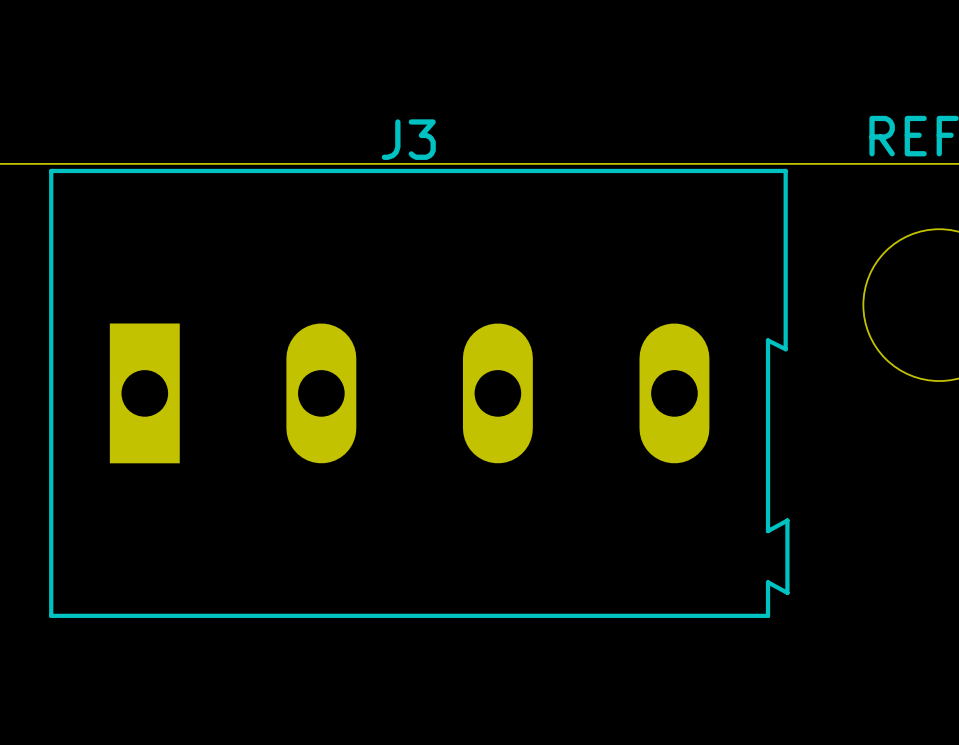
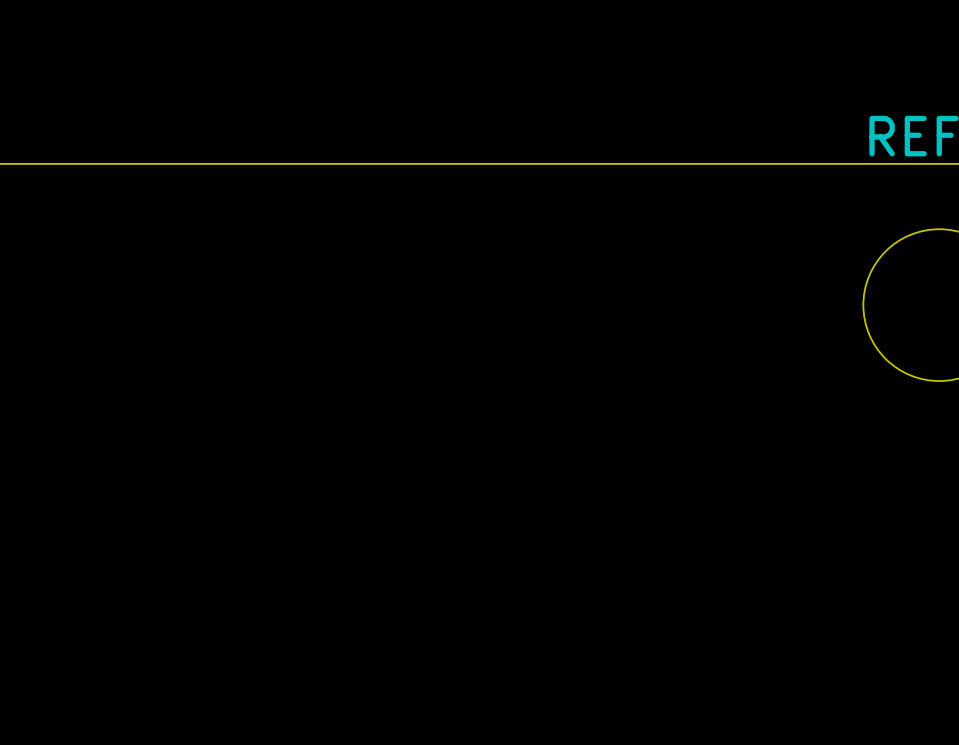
J3: (419, 393) -> none

